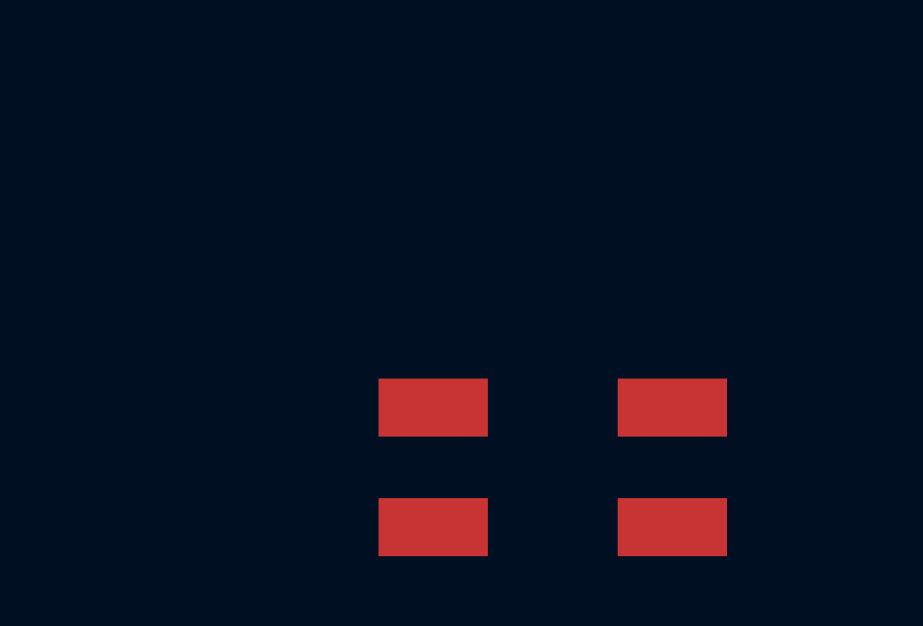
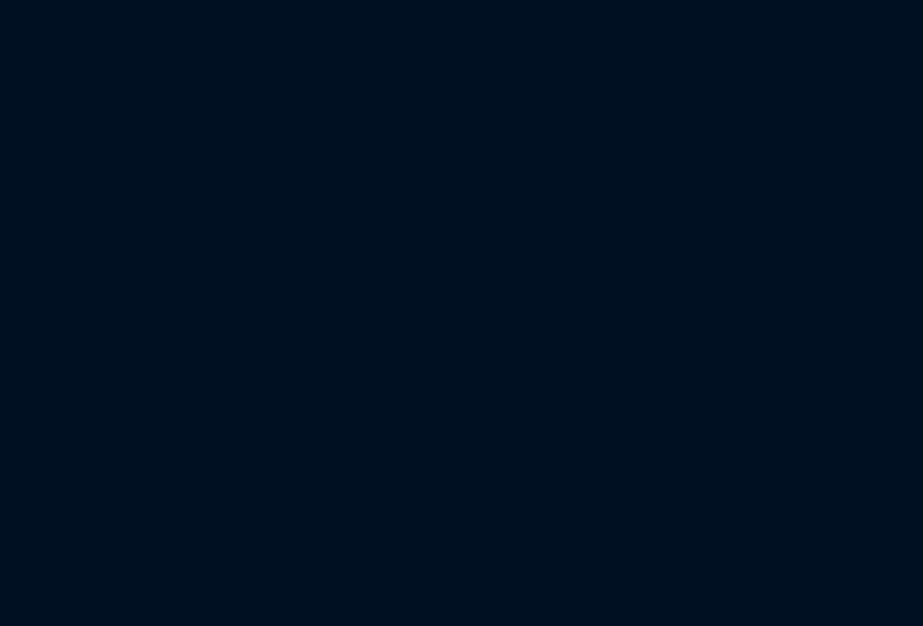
part: (552, 467) -> none

